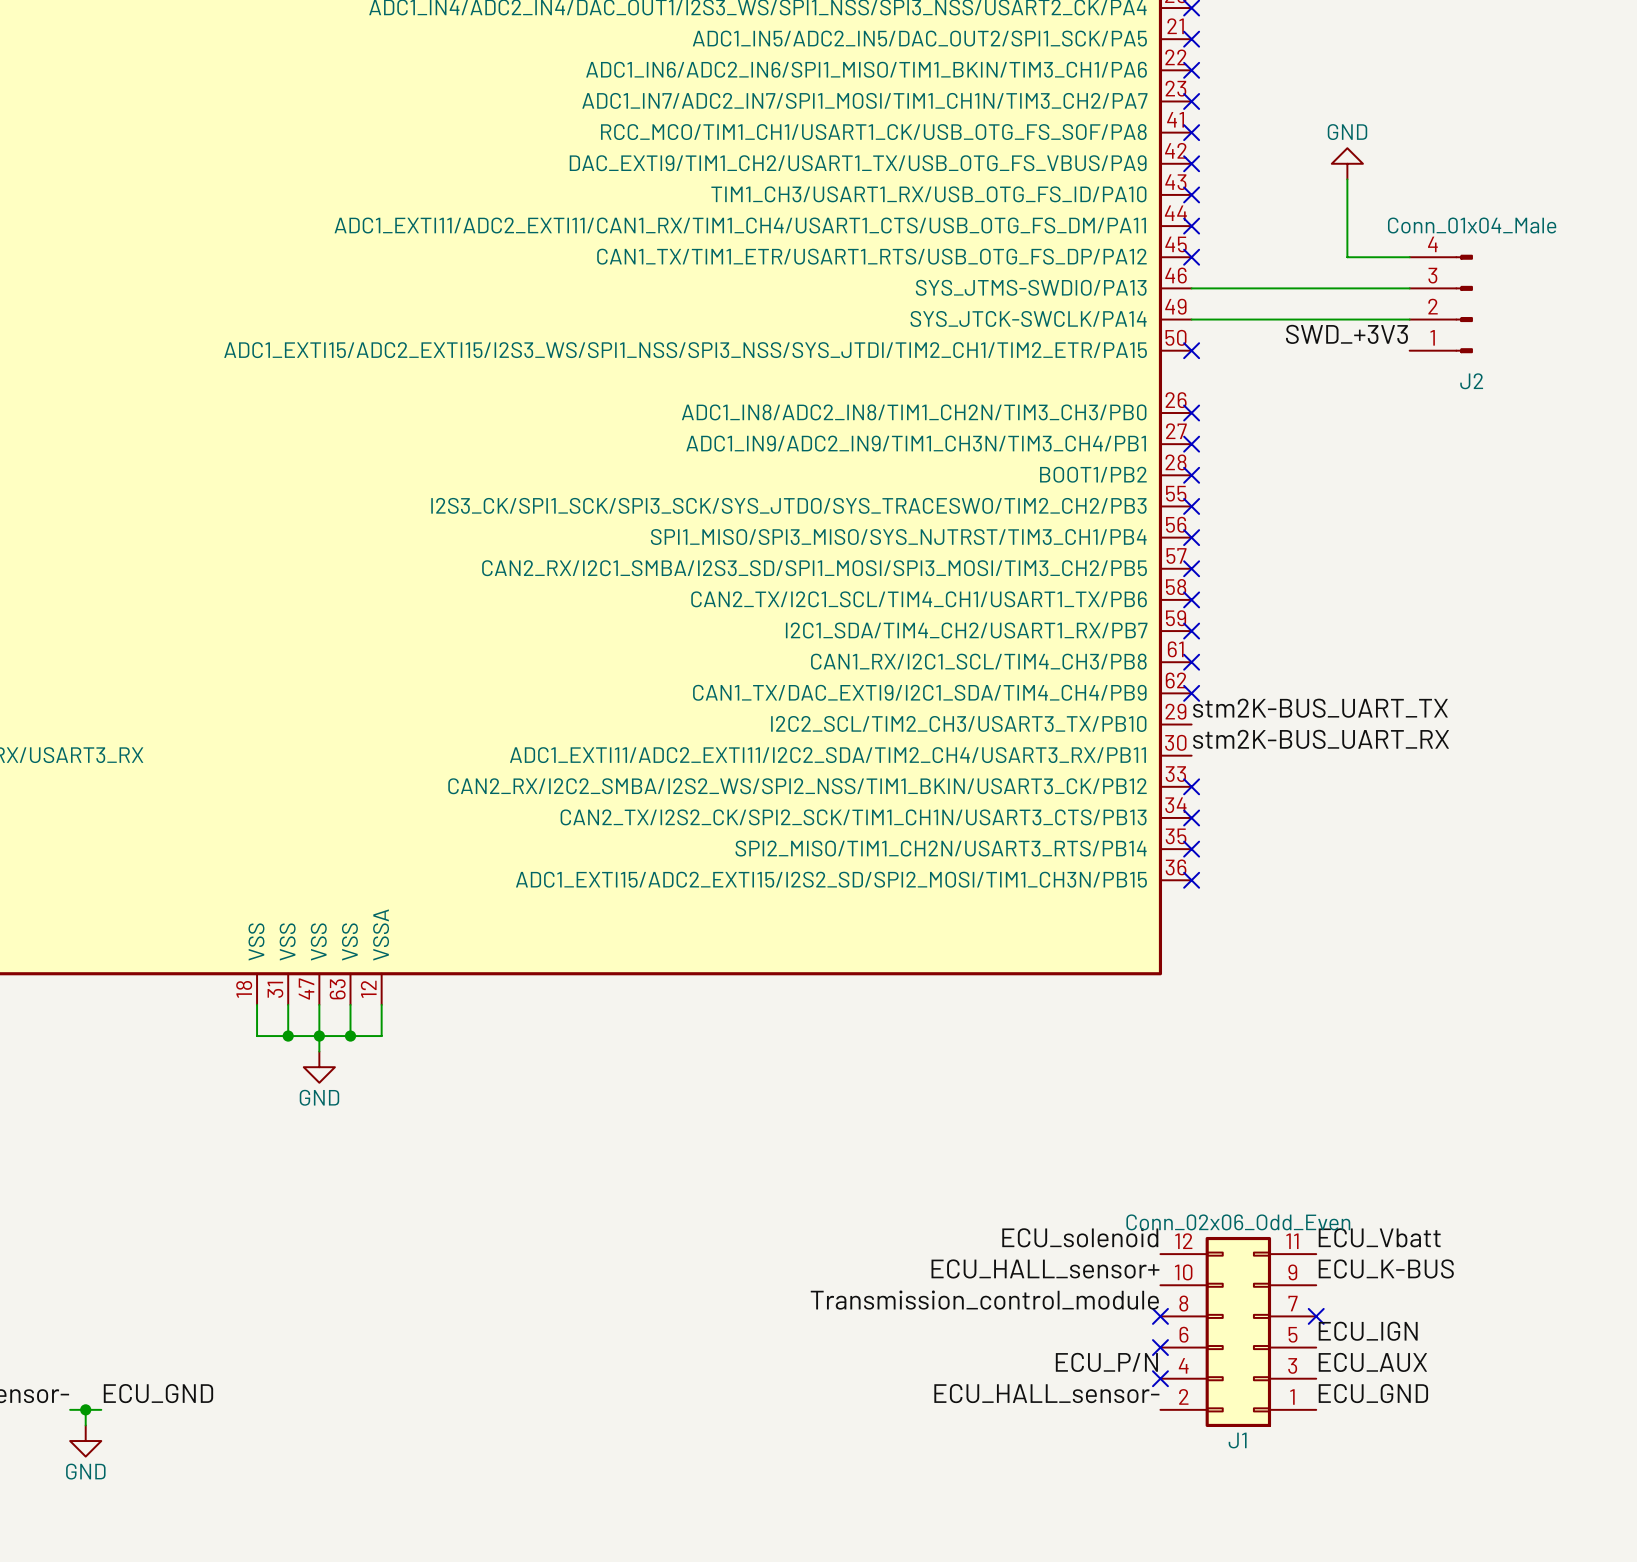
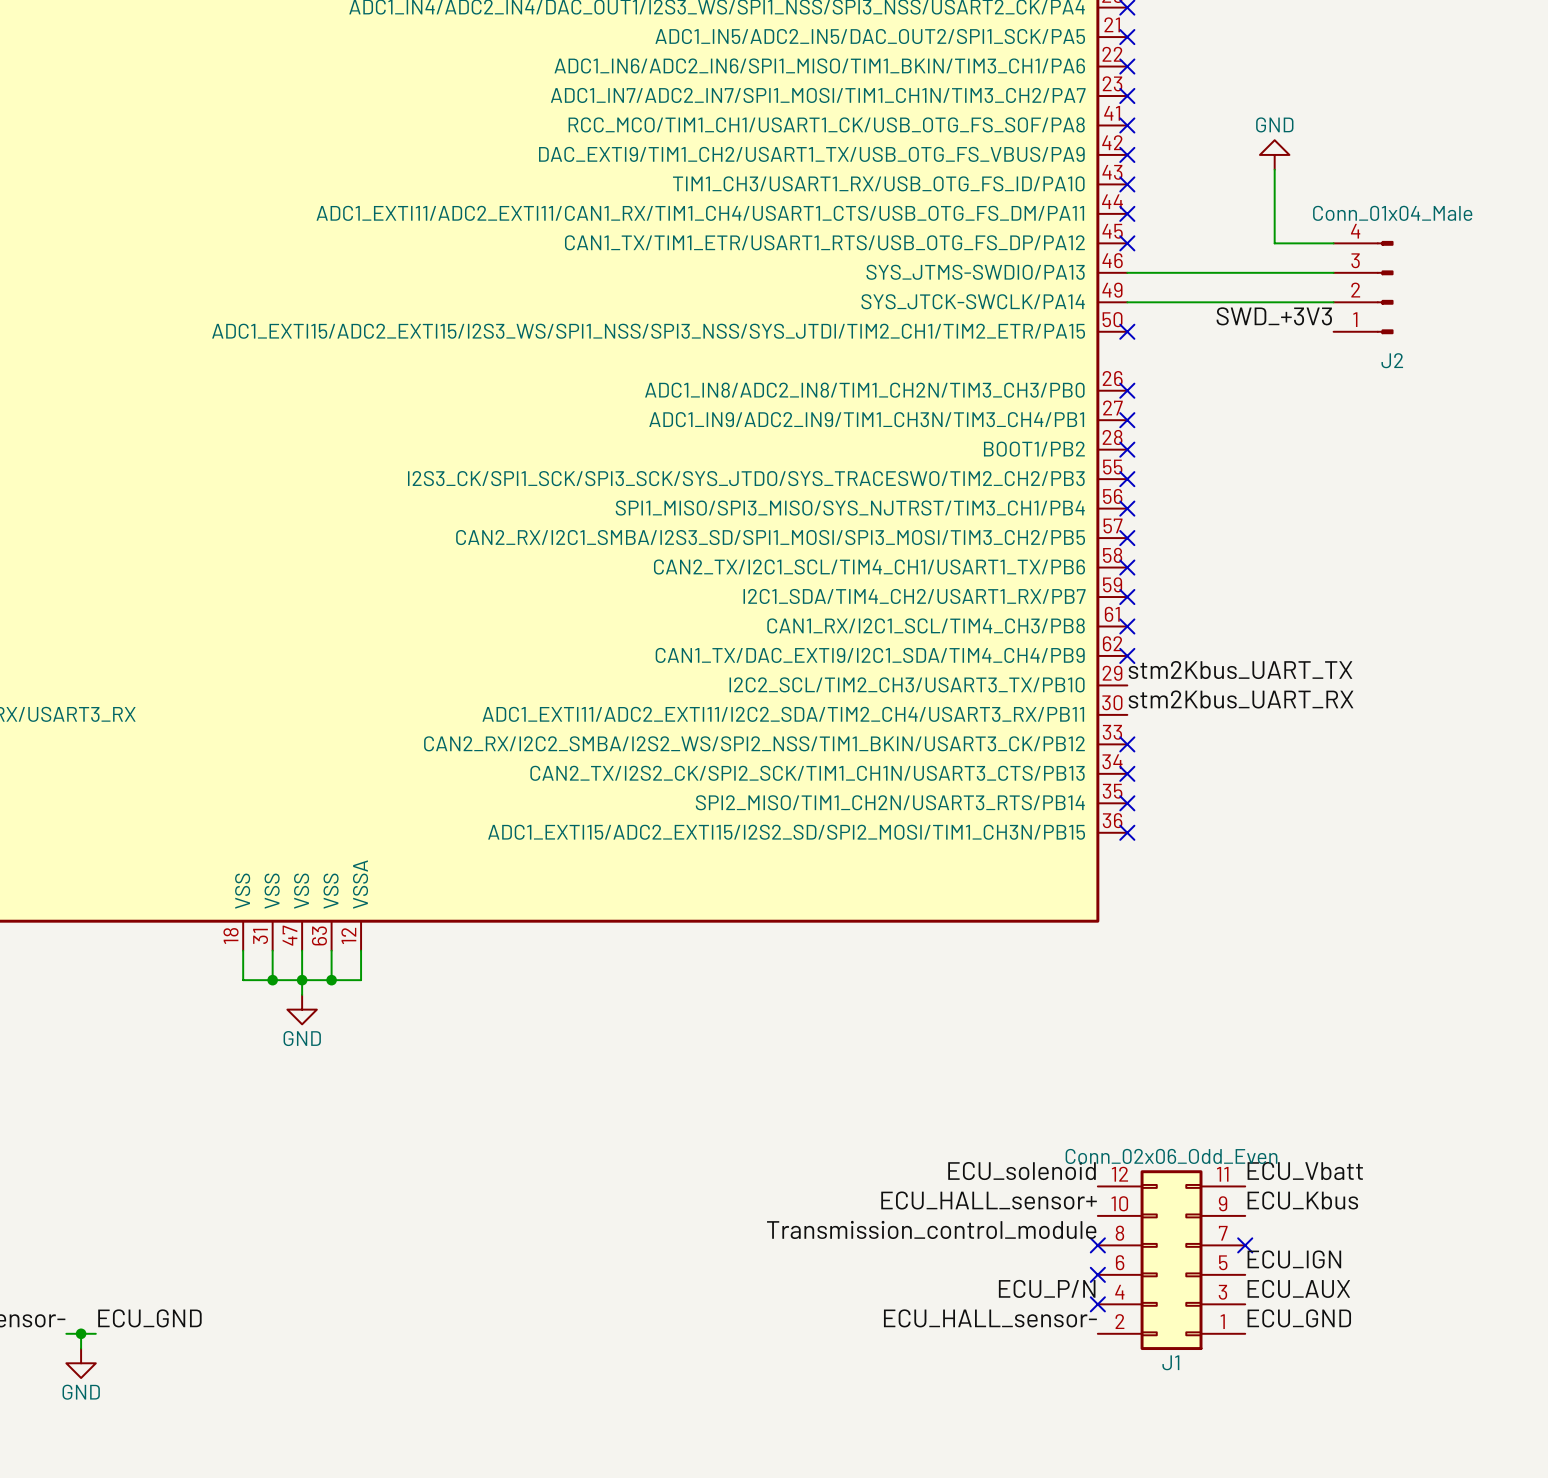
label: stm2K-BUS_UART_TX (1320, 708) -> stm2Kbus_UART_TX (1240, 670)
label: stm2K-BUS_UART_RX (1321, 739) -> stm2Kbus_UART_RX (1241, 699)
label: ECU_K-BUS (1386, 1268) -> ECU_Kbus (1302, 1200)

